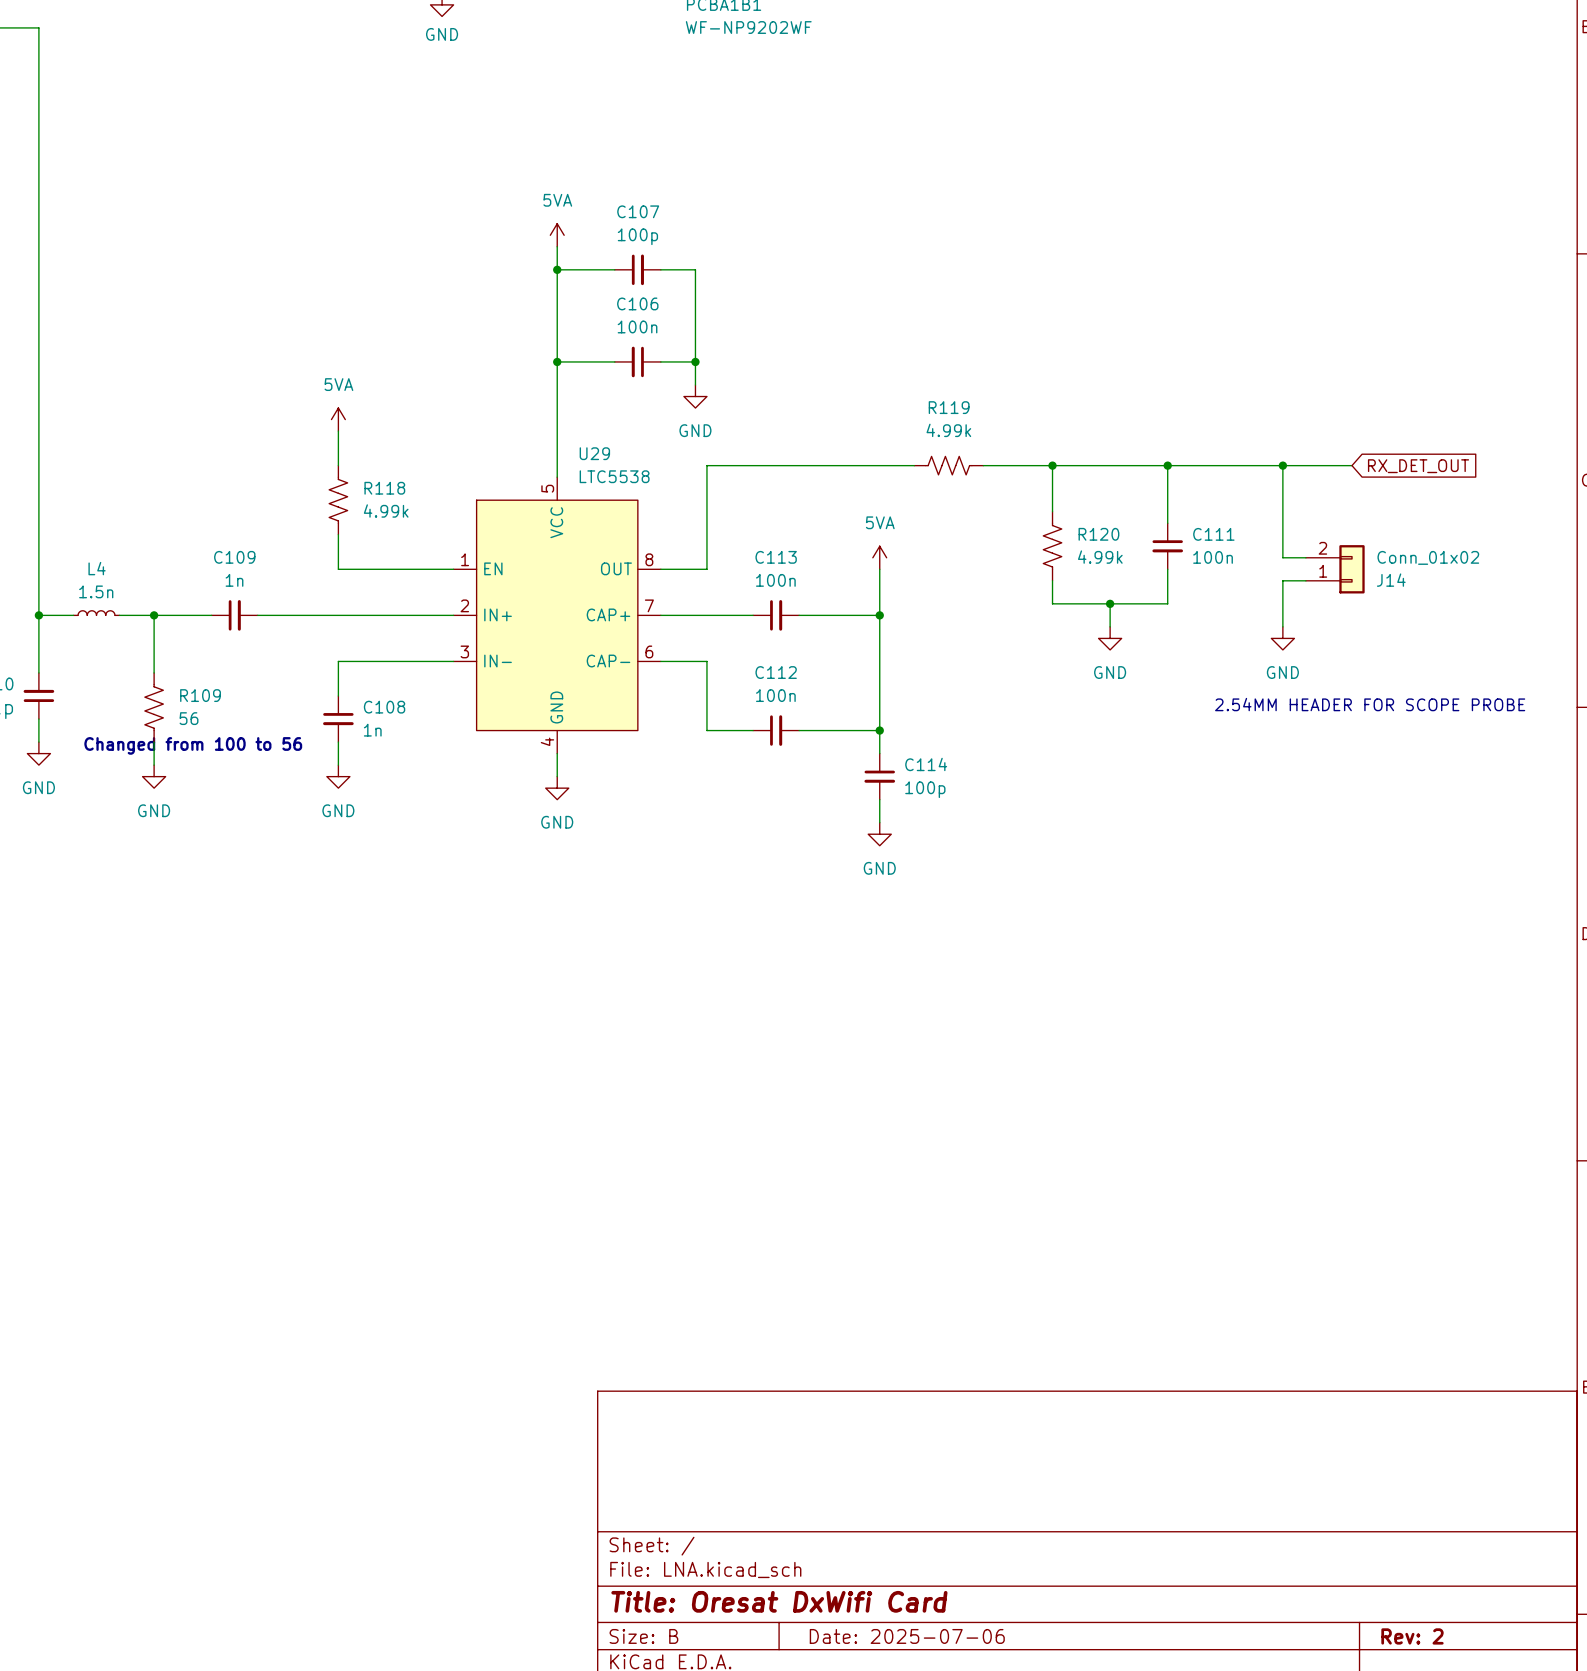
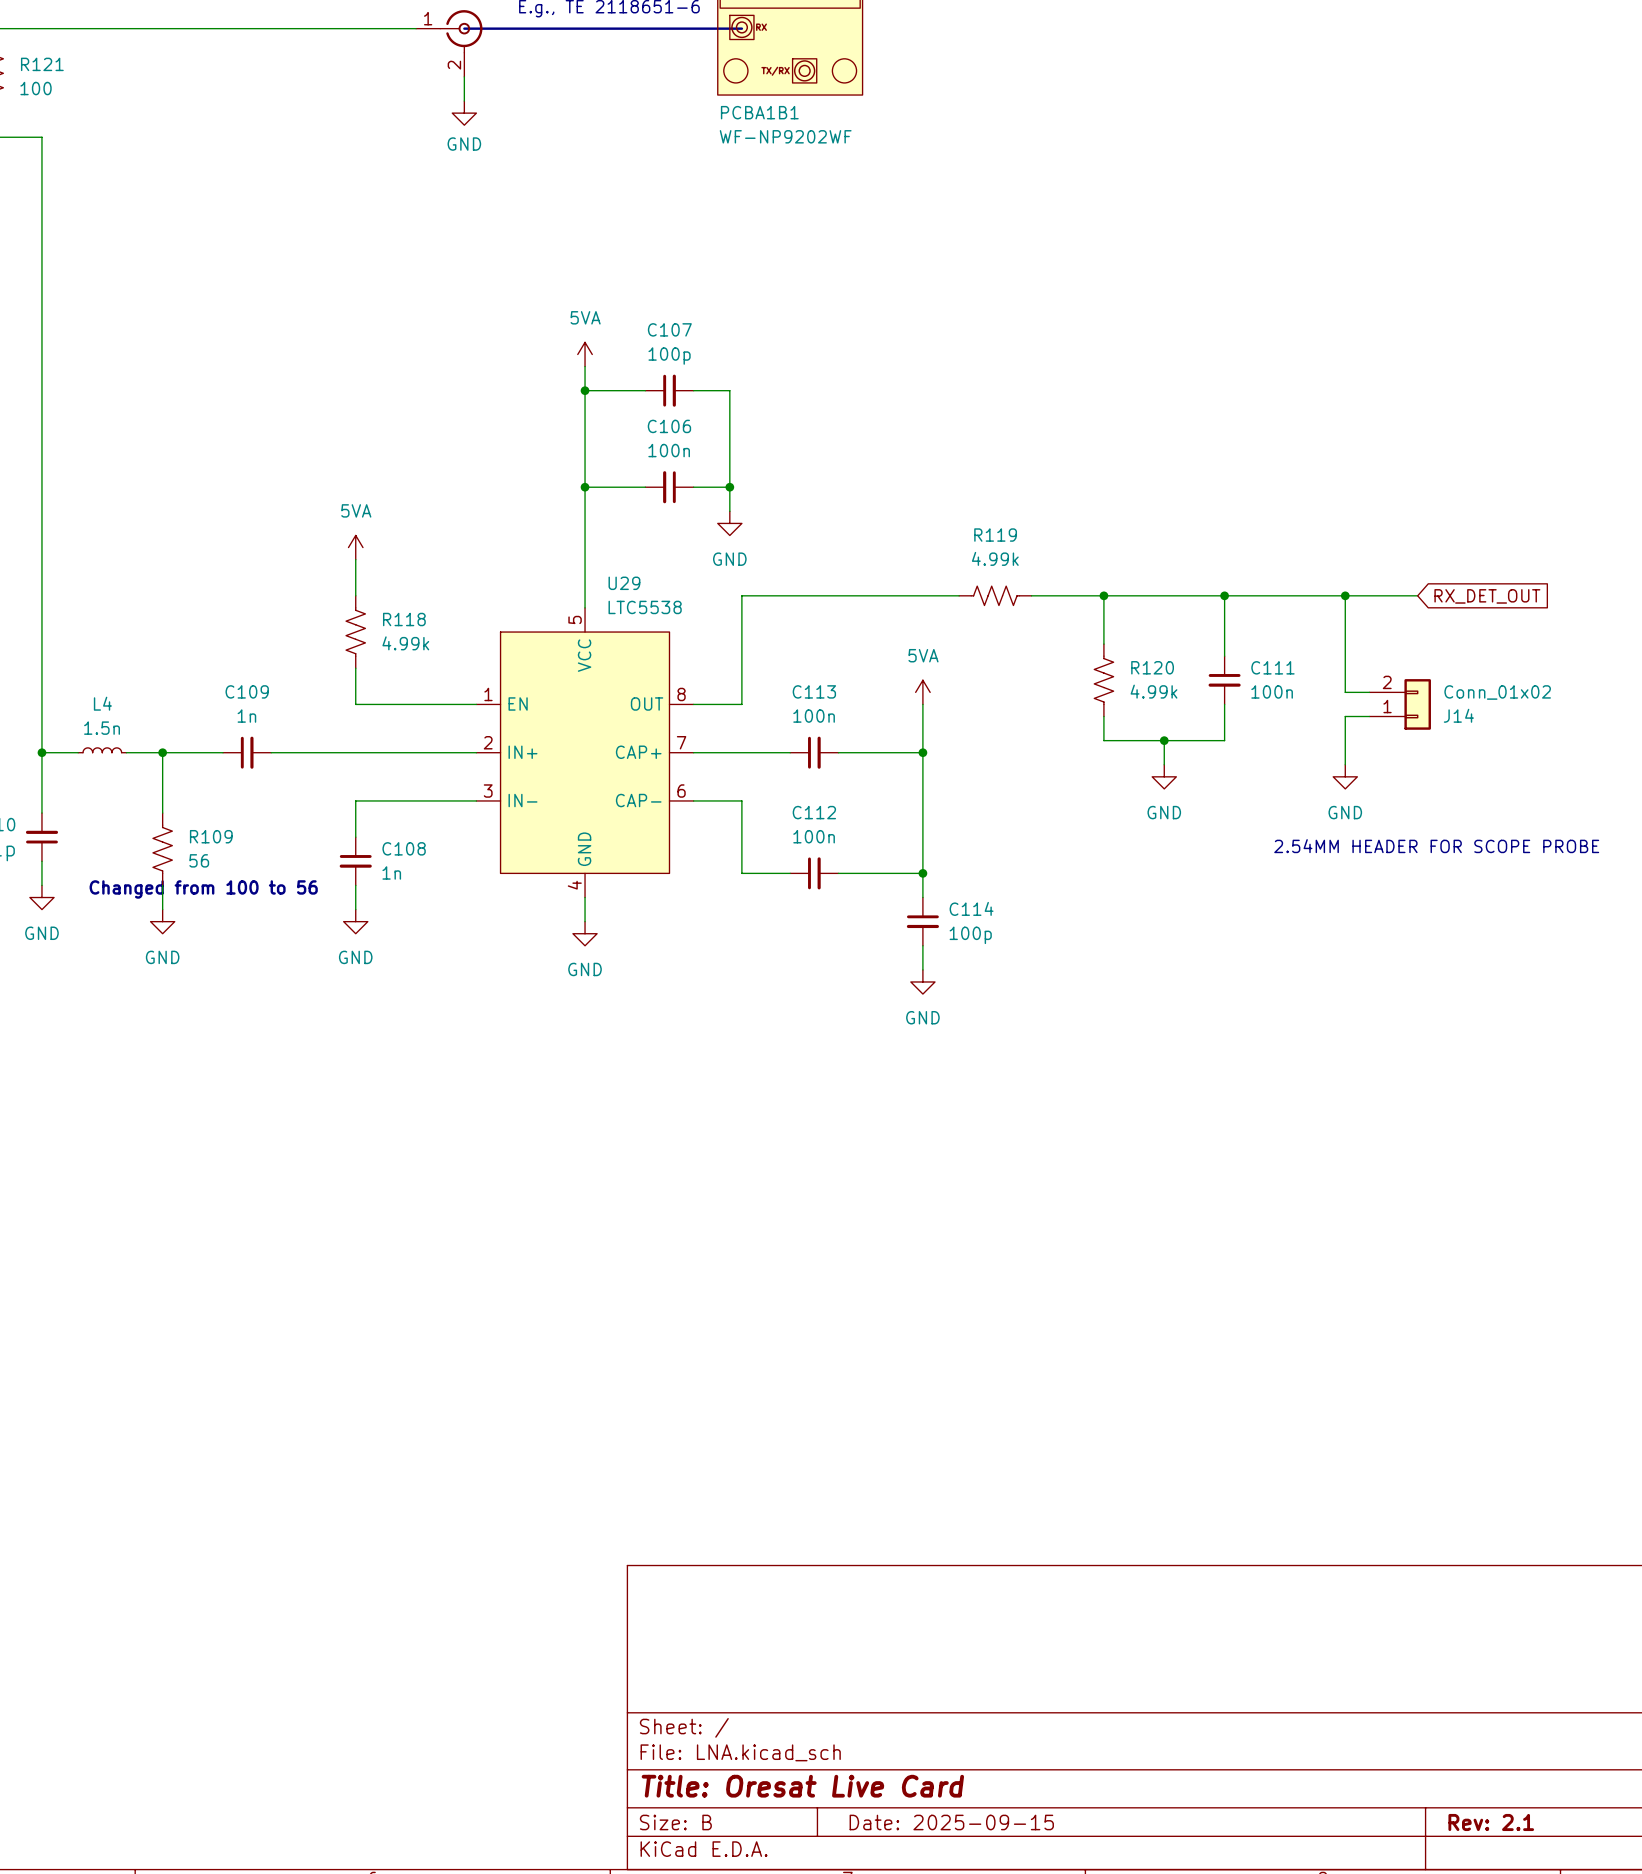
title block: Title: Oresat DxWifi Card (779, 1601) -> Title: Oresat Live Card (802, 1786)
title block: Date: 2025-07-06 (907, 1636) -> Date: 2025-09-15 (951, 1822)
title block: Rev: 2 (1412, 1636) -> Rev: 2.1 (1491, 1822)

